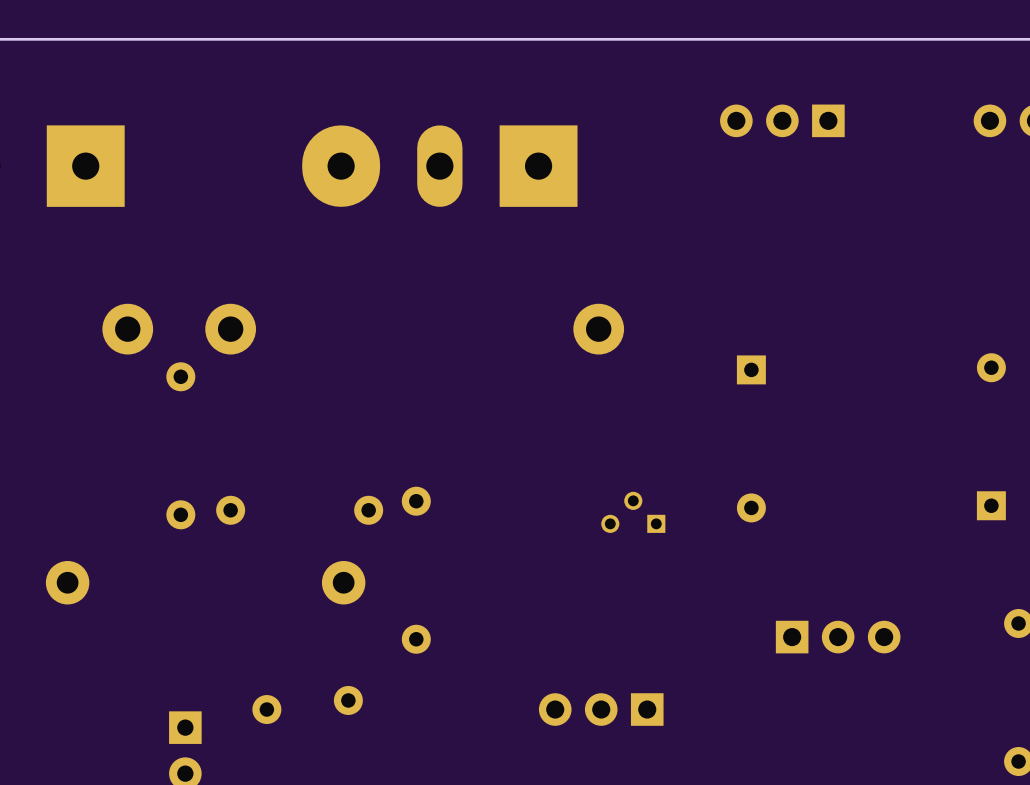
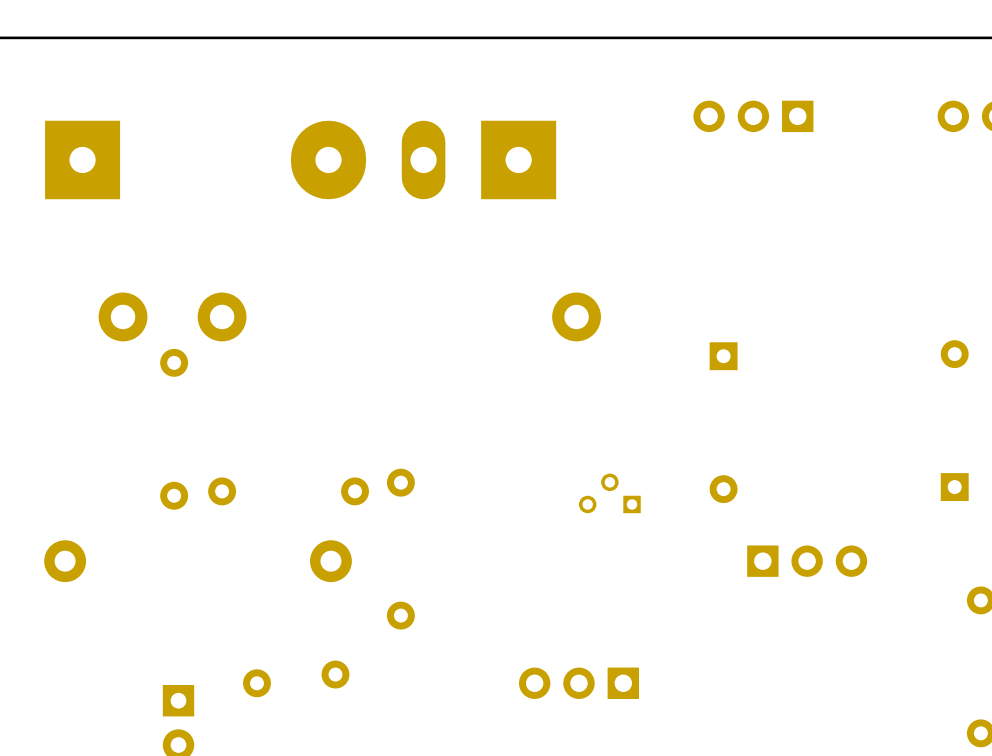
part position: (838, 637) -> (807, 561)

